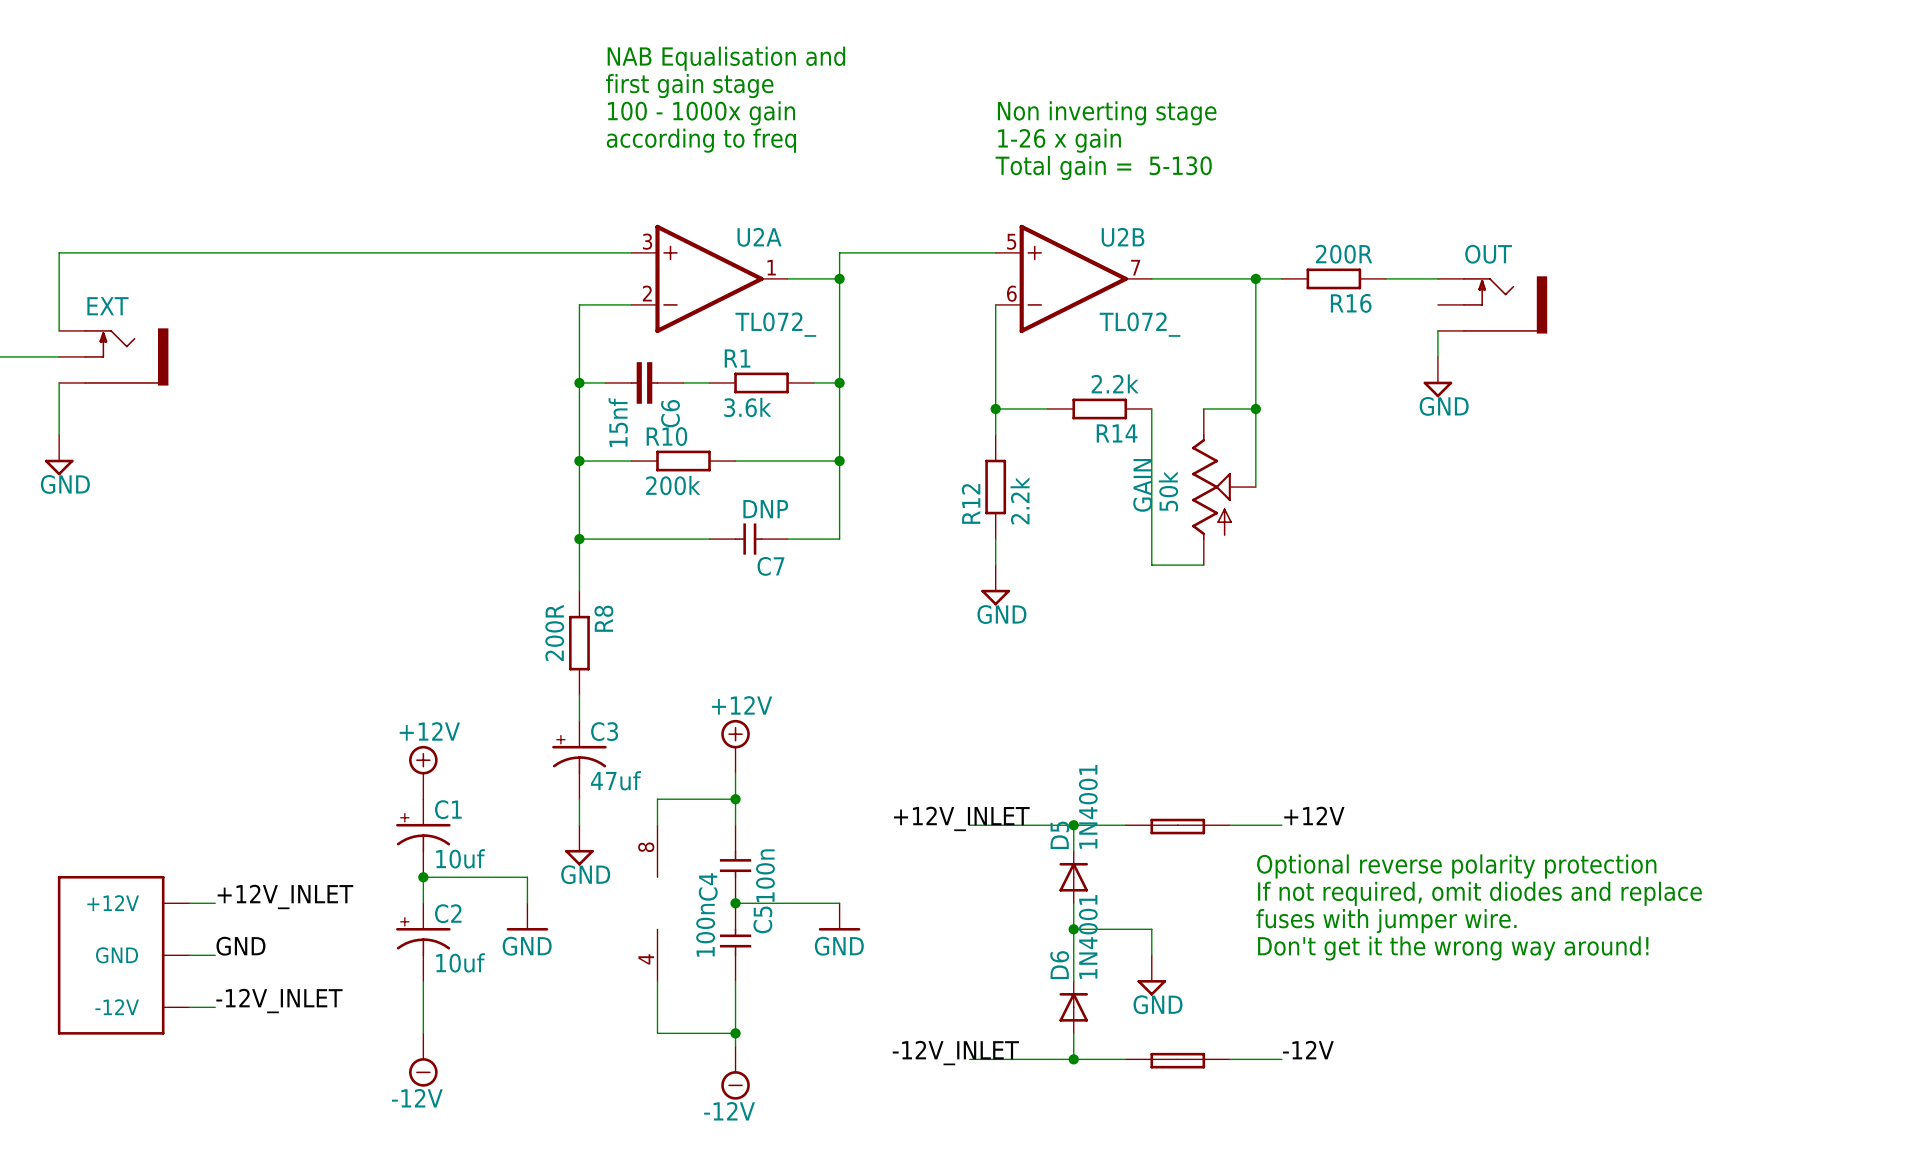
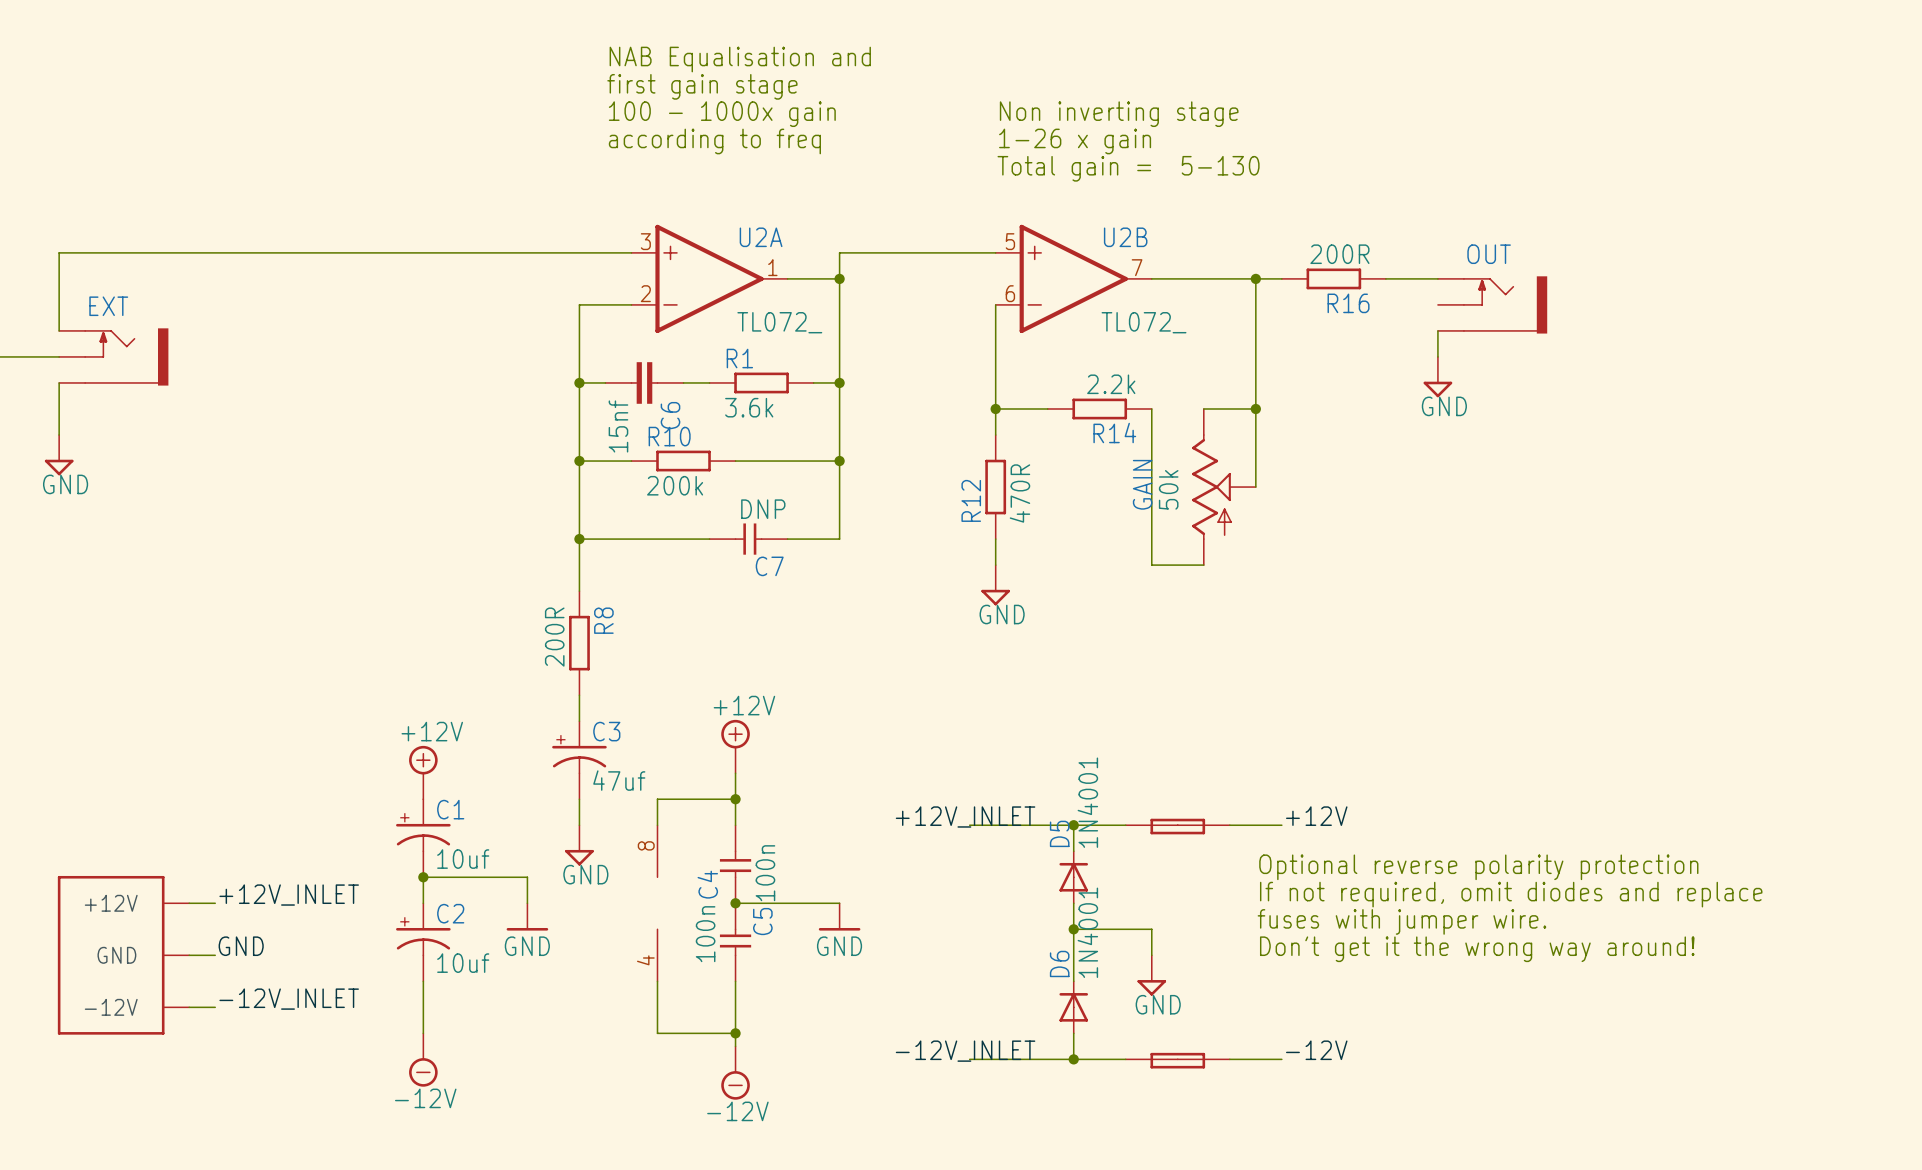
R12 value: 2.2k (1020, 500) -> 470R (1019, 493)

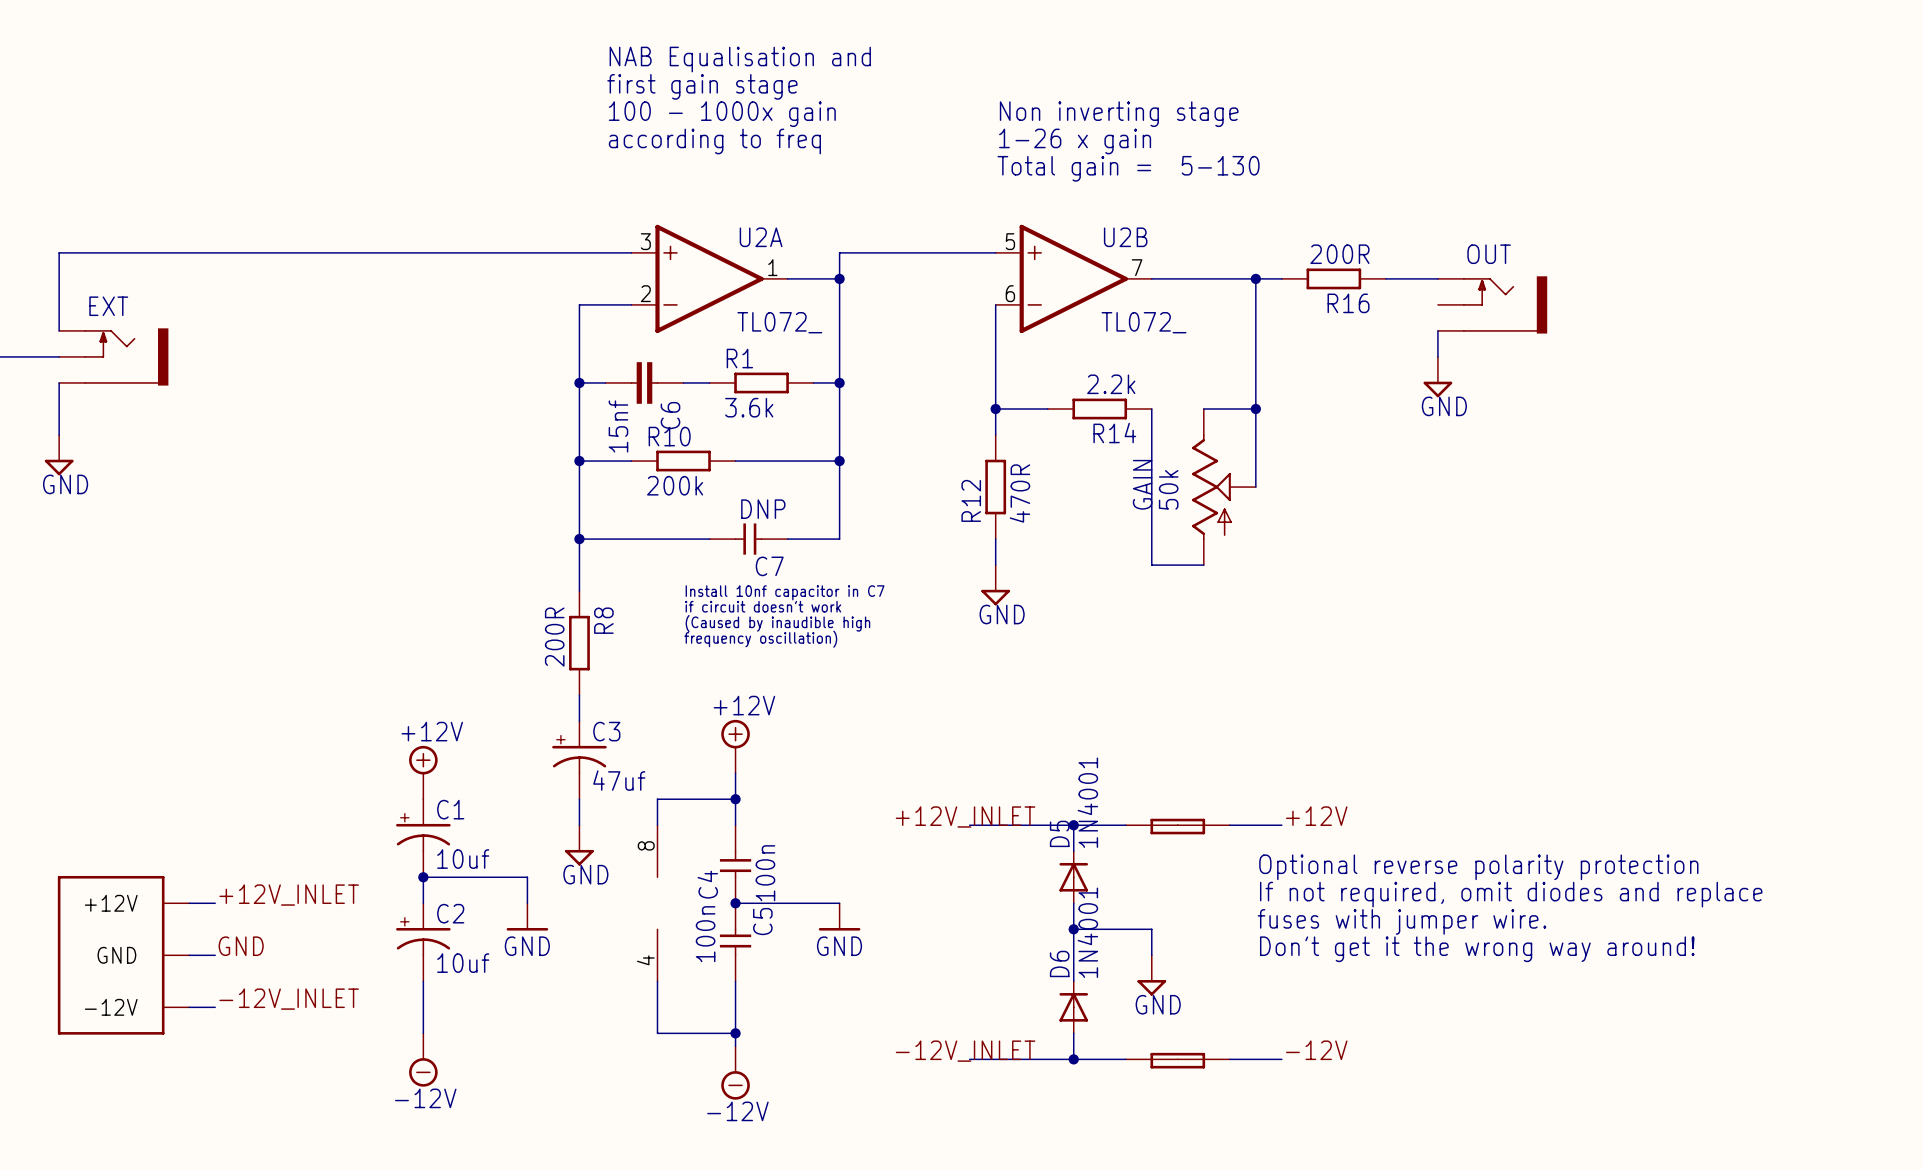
text: none -> Install 10nf capacitor in C7 (785, 592)
text: none -> if circuit doesn't work (763, 606)
text: none -> (Caused by inaudible high (777, 623)
text: none -> frequency oscillation) (760, 639)

